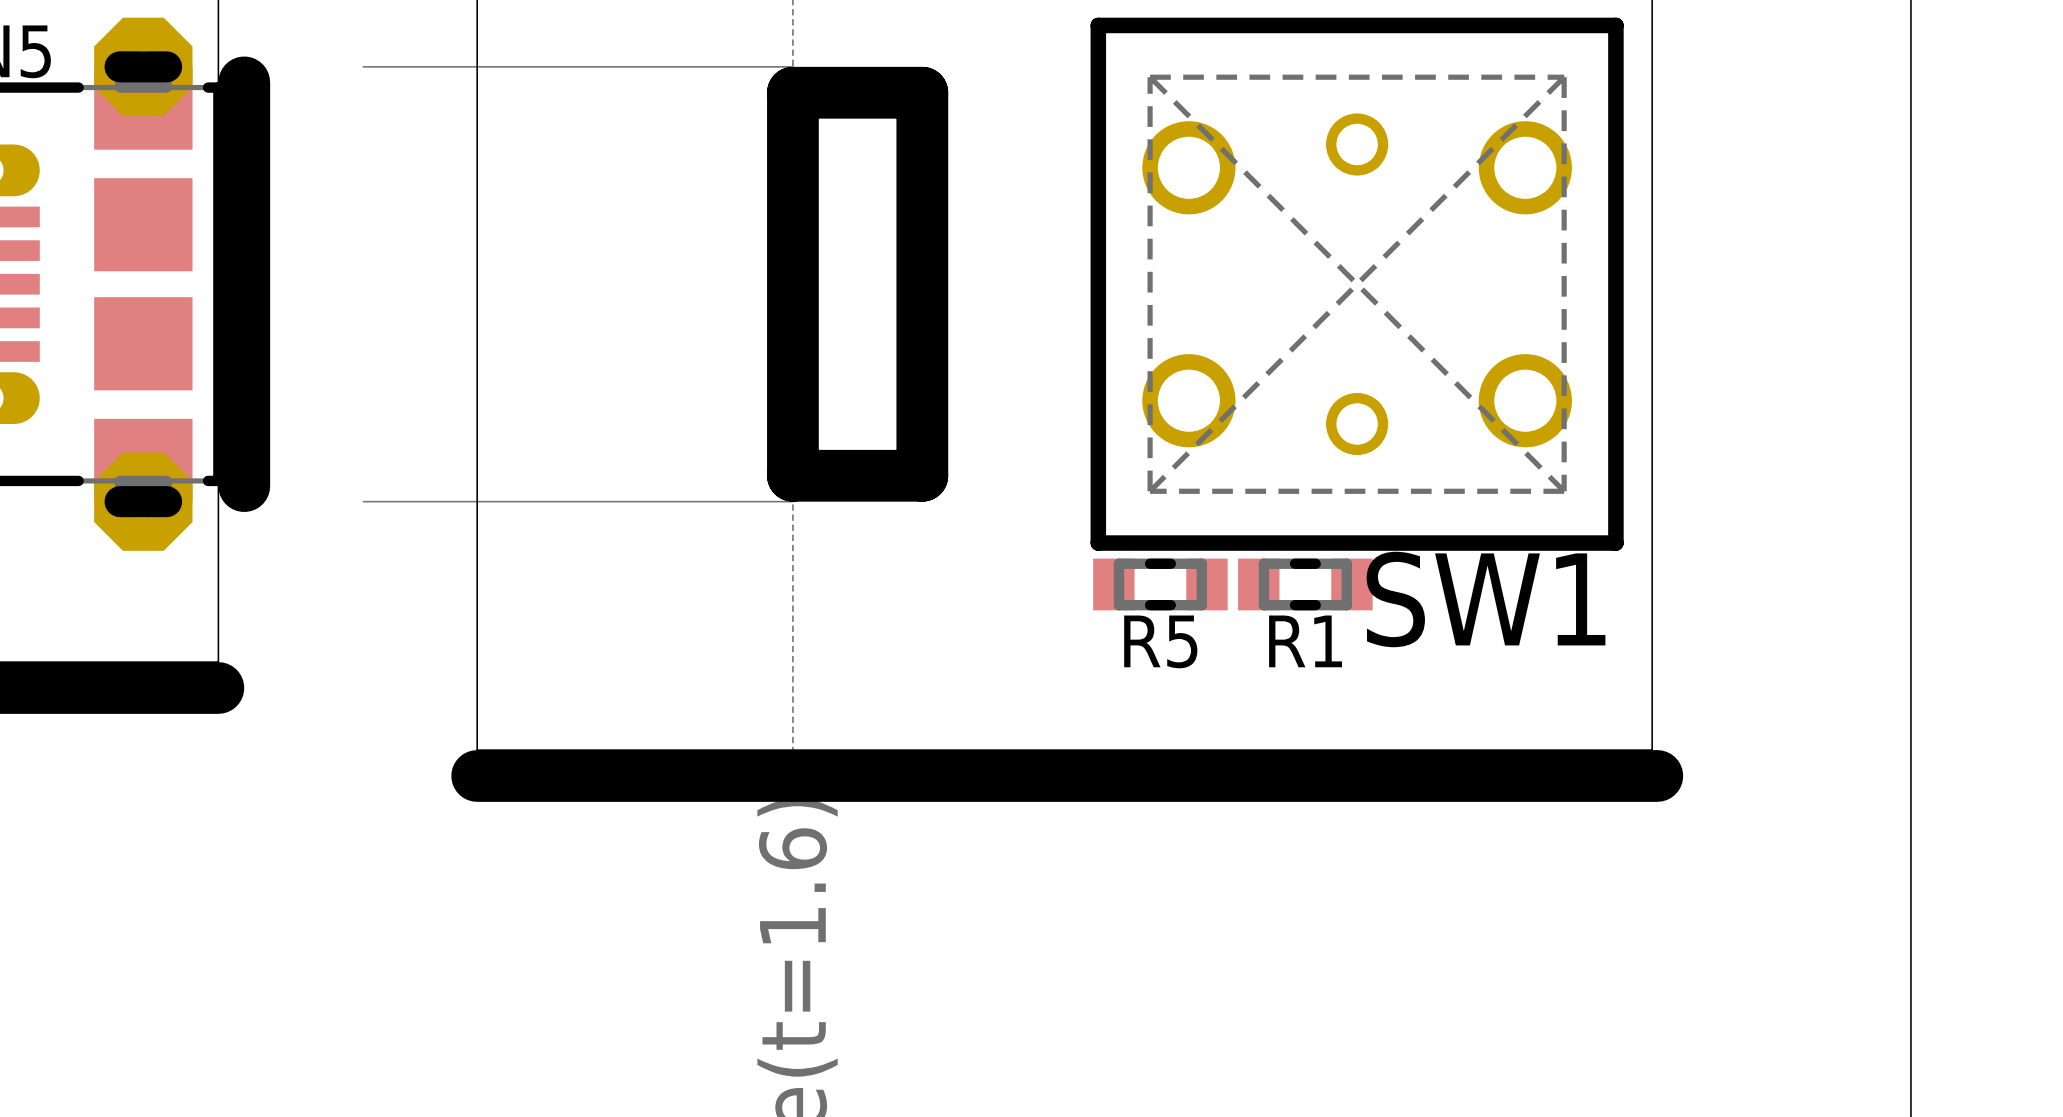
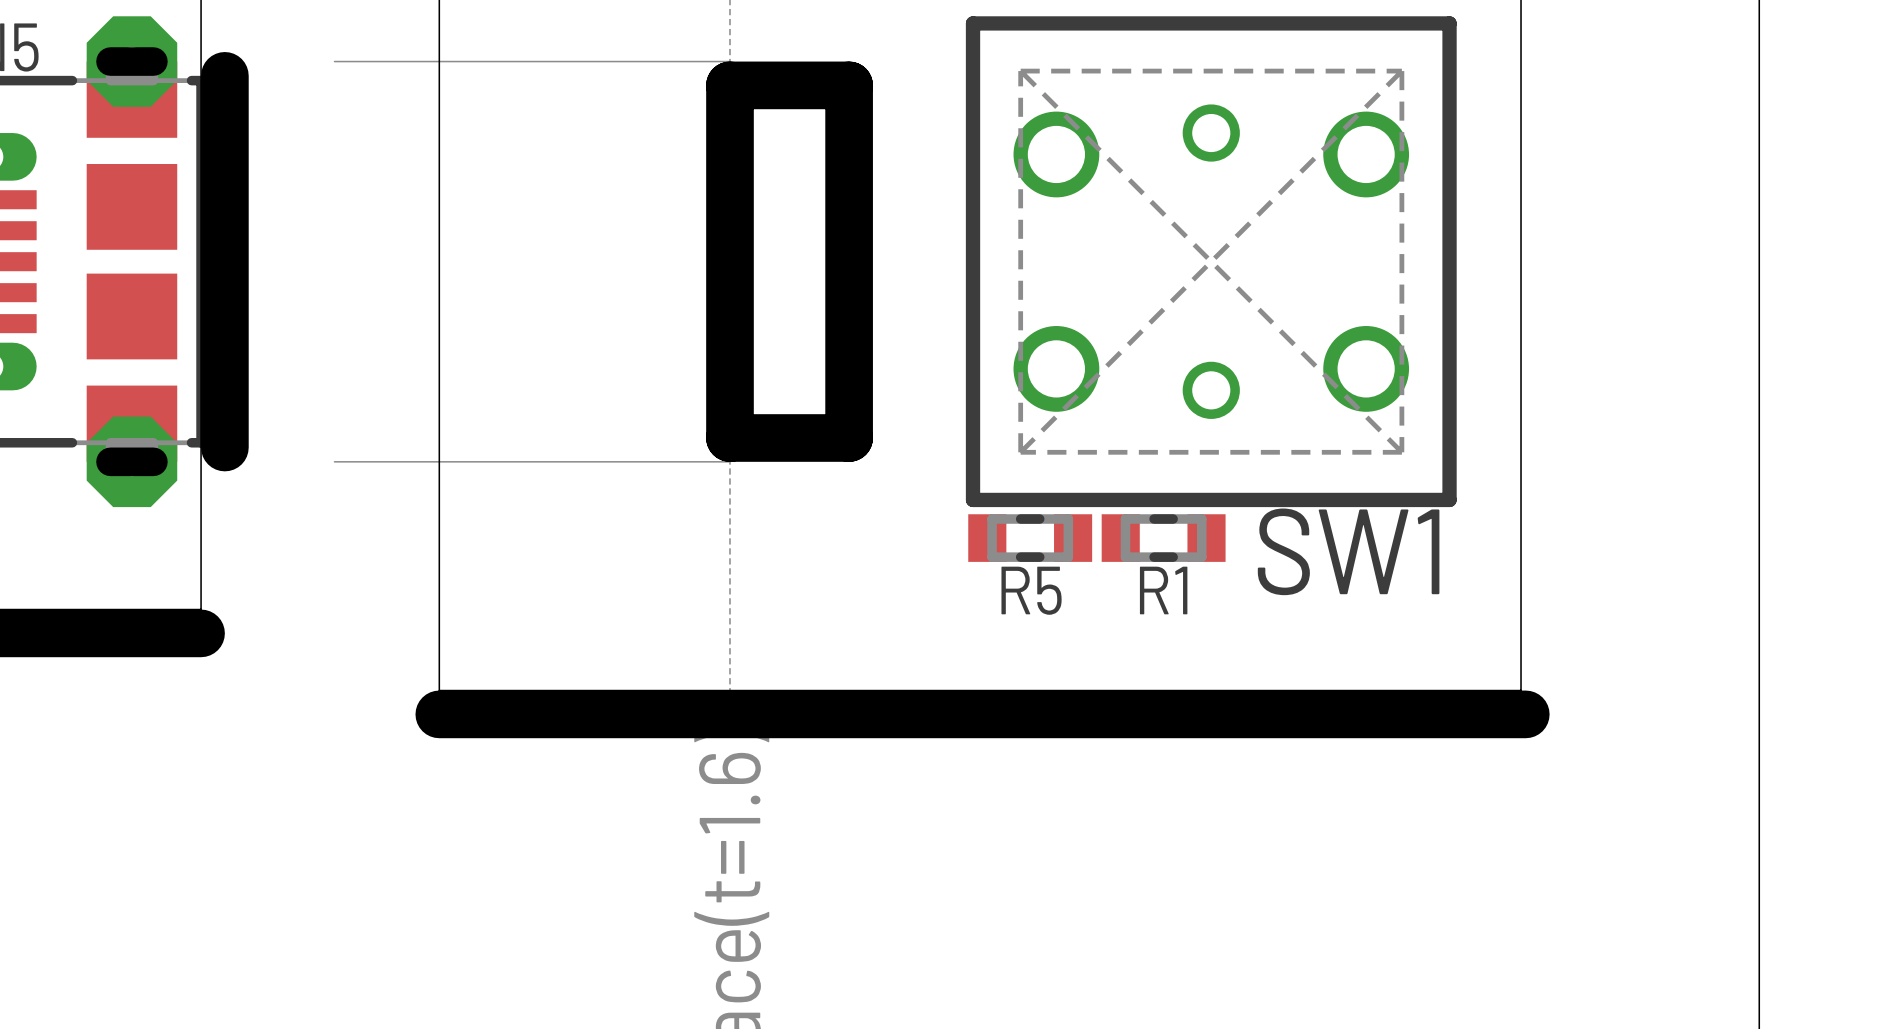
SW1 position: (1357, 284) -> (1211, 261)
R5 position: (1160, 584) -> (1030, 538)
R1 position: (1305, 584) -> (1163, 538)

